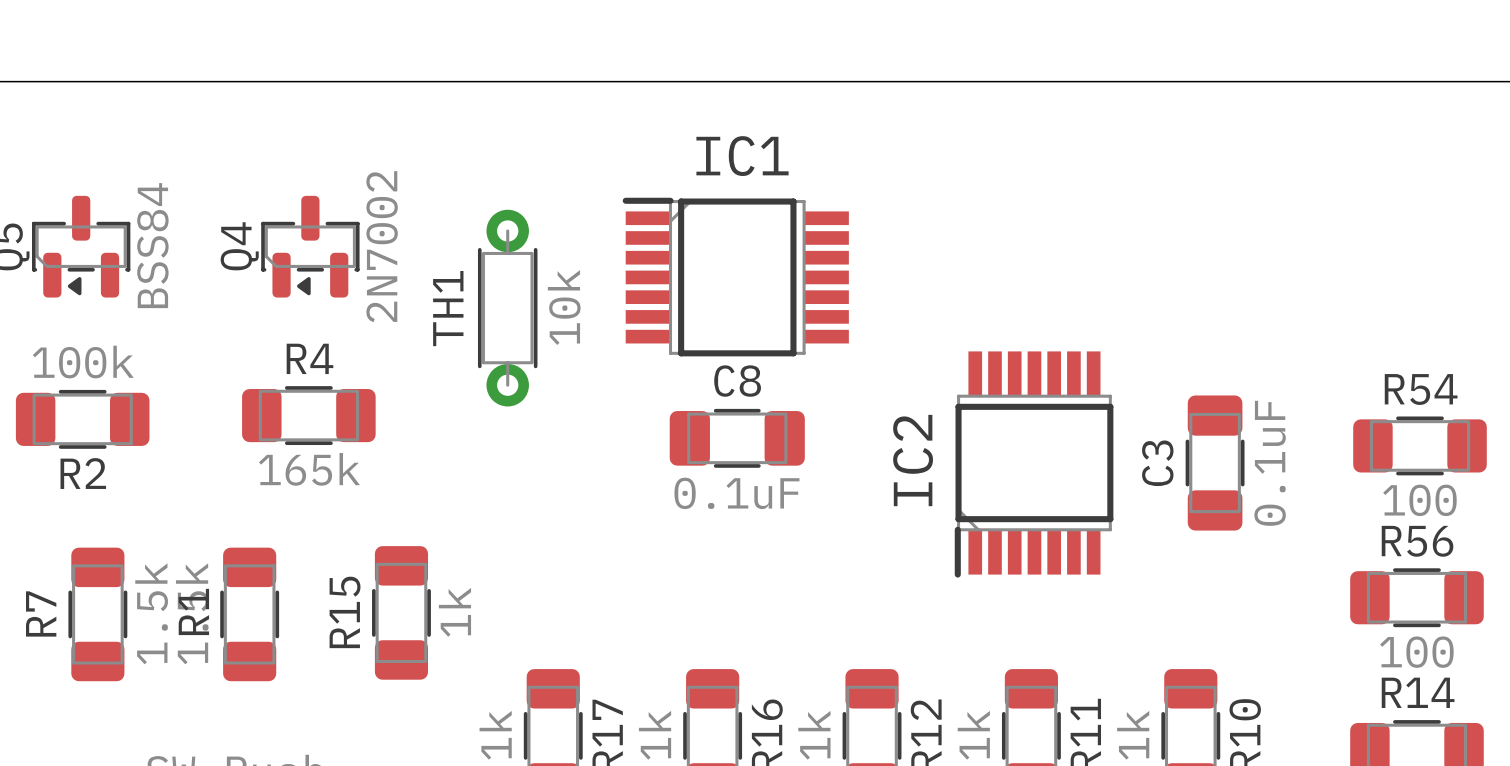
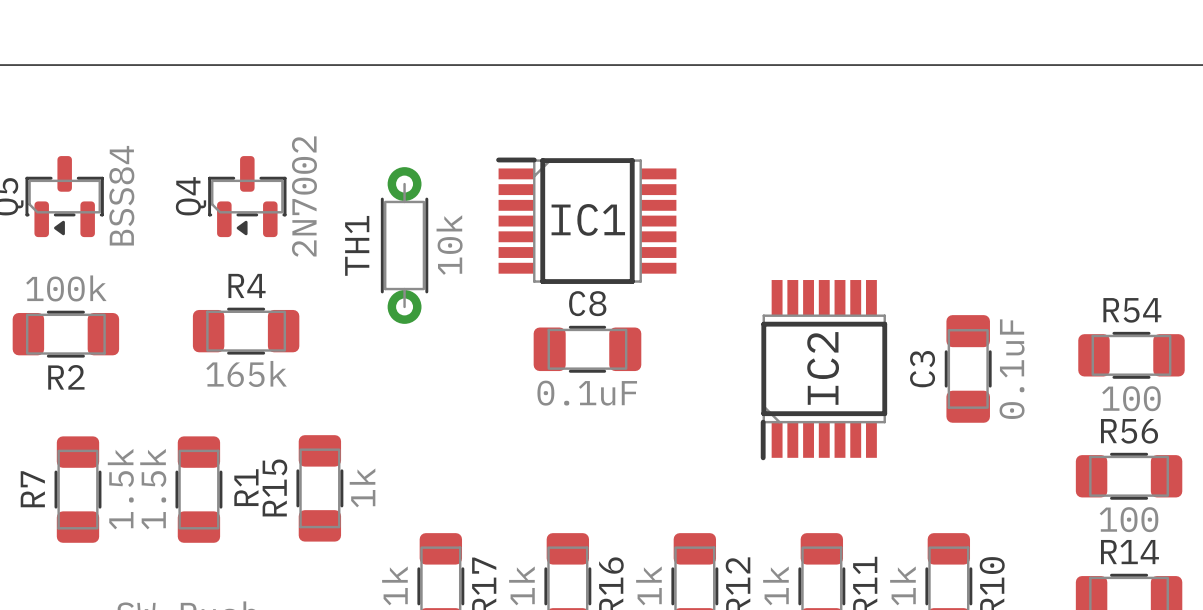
IC1 name position: IC1 (742, 156) -> IC1 (588, 219)
IC2 name position: IC2 (913, 460) -> IC2 (823, 368)
R1 name position: R1 (193, 611) -> R1 (246, 487)

